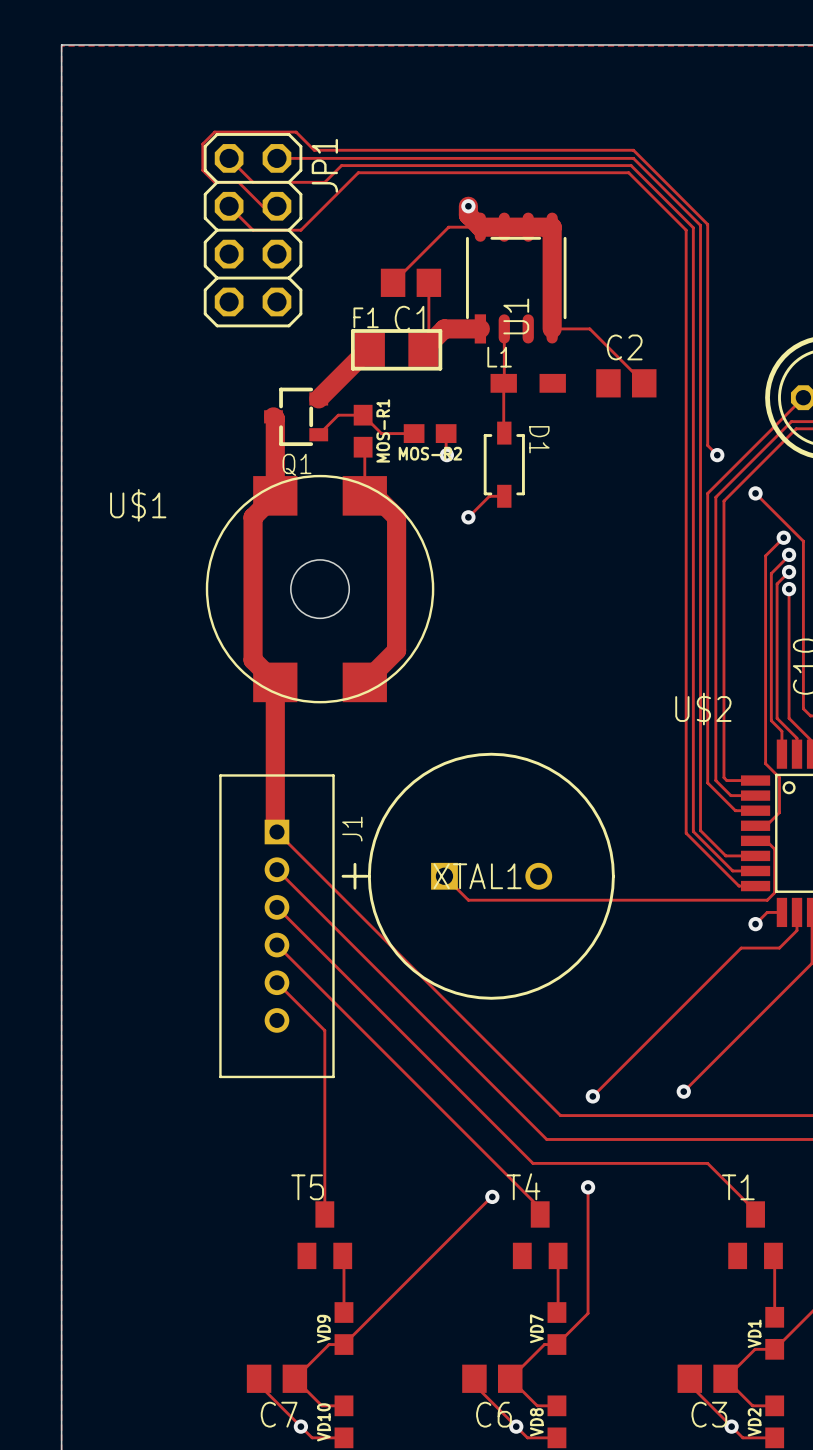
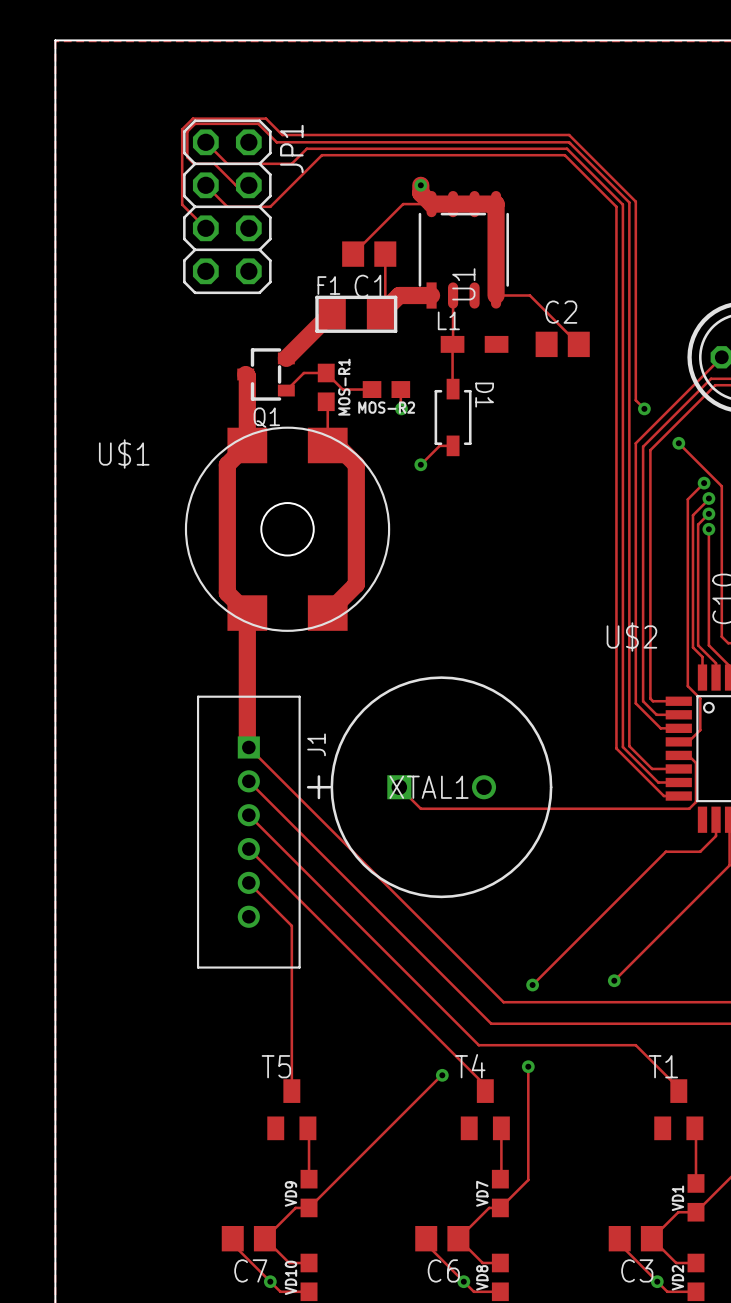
track: (276, 158) (308, 158) -> (193, 163) (187, 157) (187, 131) (195, 123) (258, 123) (276, 142)
track: (202, 170) (215, 182) -> (182, 153) (182, 204) (205, 228)
track: (781, 912) (767, 912) (755, 924) -> none
via: (755, 924) -> none

